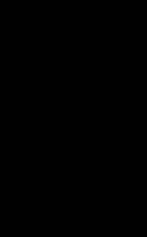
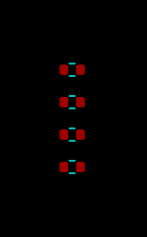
part: none -> (72, 69)
part: none -> (72, 102)
part: none -> (72, 134)
part: none -> (72, 167)

